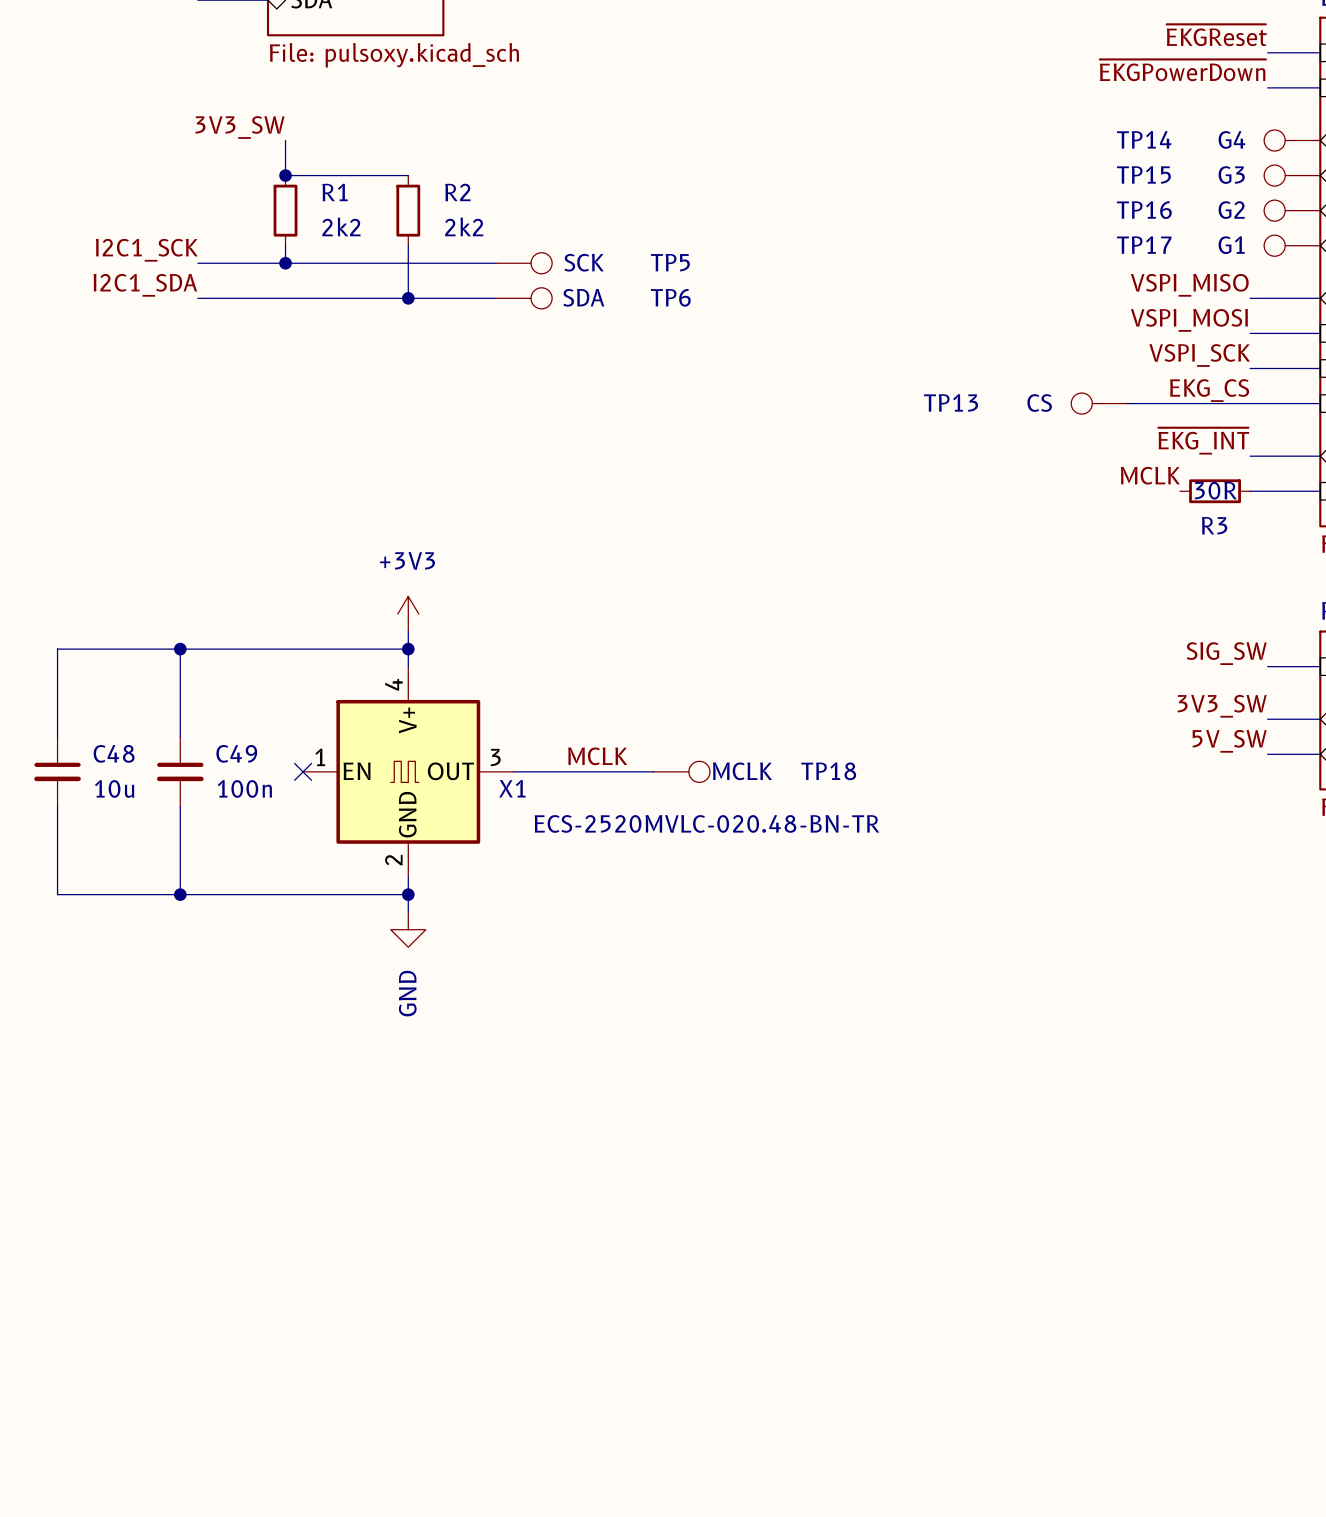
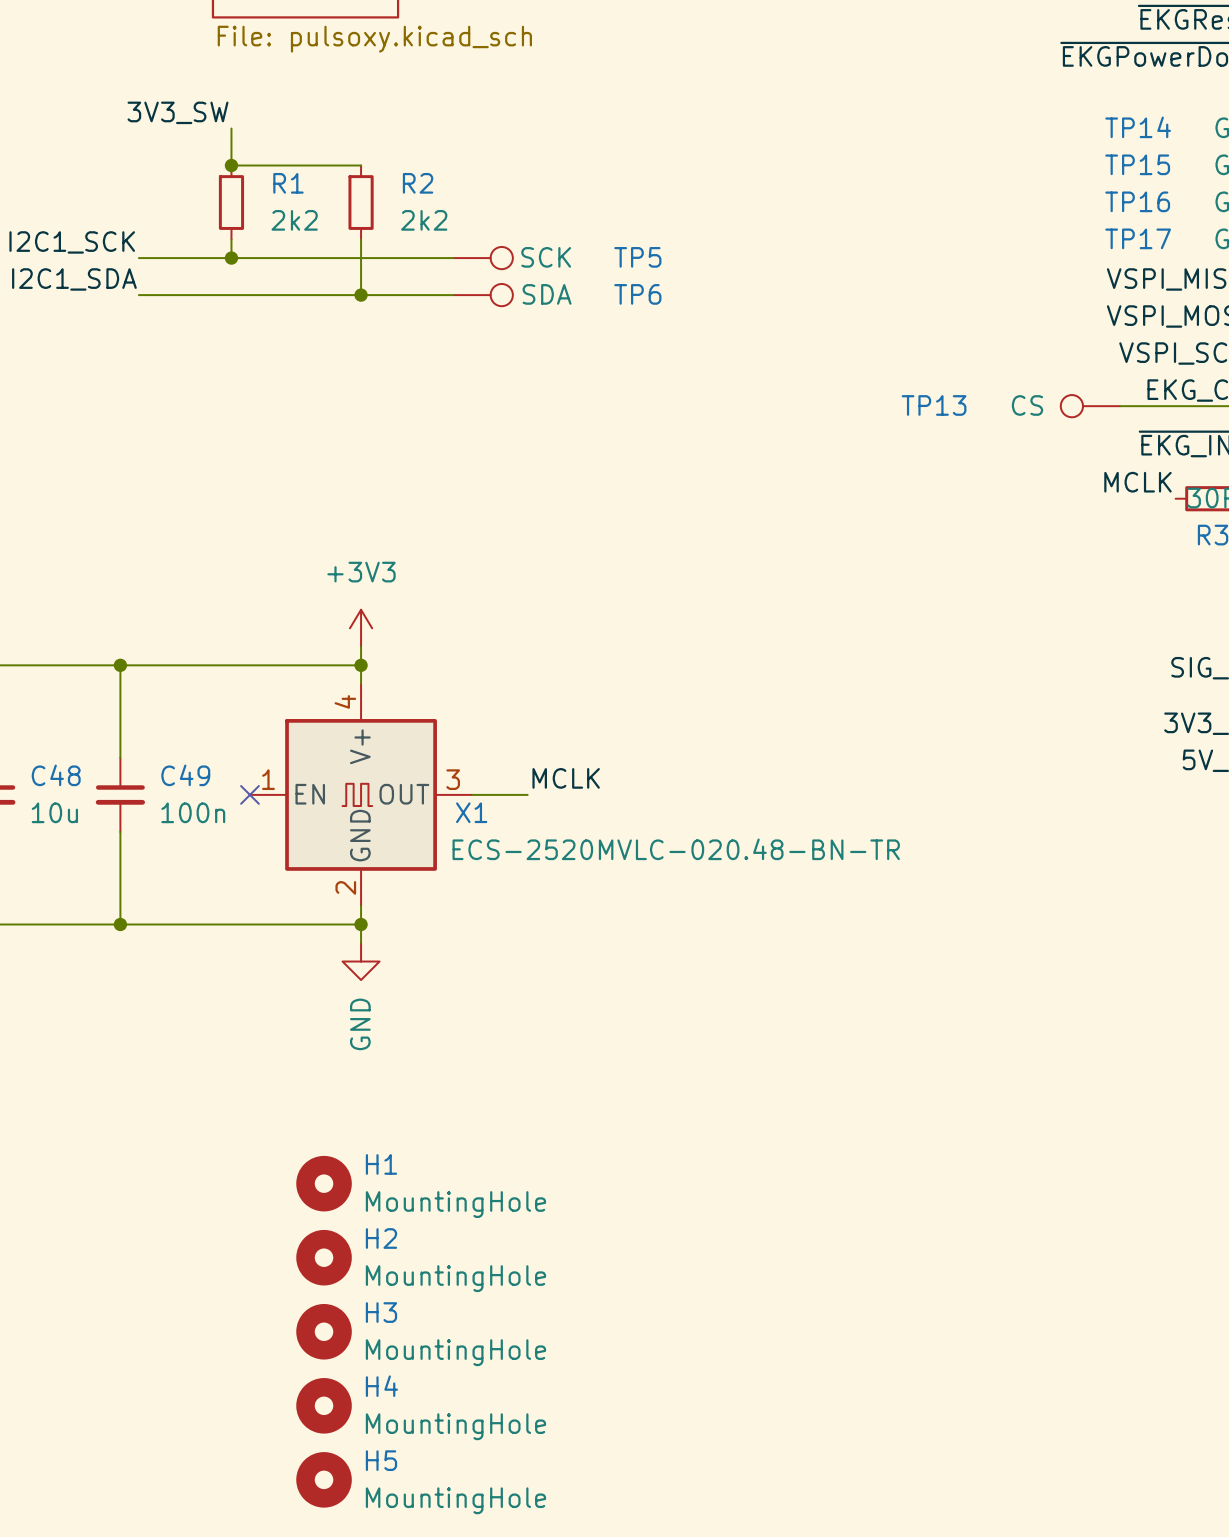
wire: (566, 771) (653, 771) -> none
TP18: MCLK (681, 771) -> none
H1: none -> MountingHole (324, 1183)
H2: none -> MountingHole (324, 1257)
H3: none -> MountingHole (324, 1331)
H4: none -> MountingHole (324, 1405)
H5: none -> MountingHole (324, 1479)

